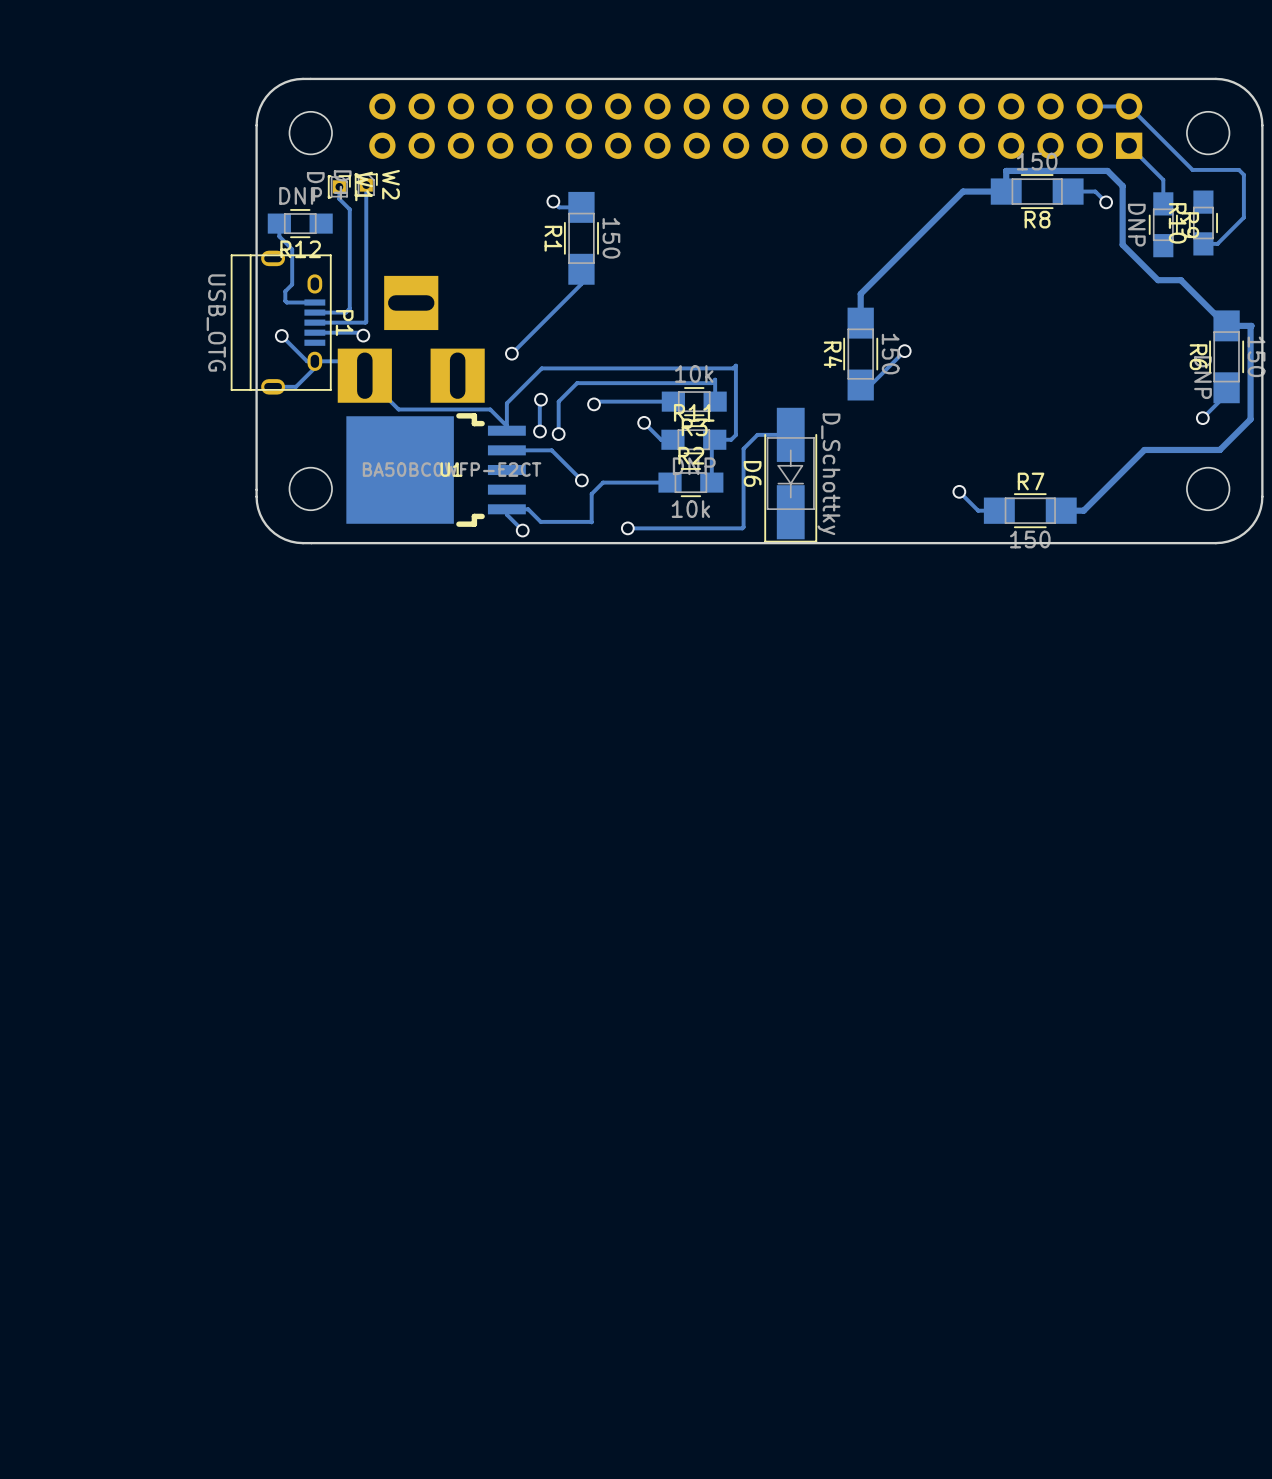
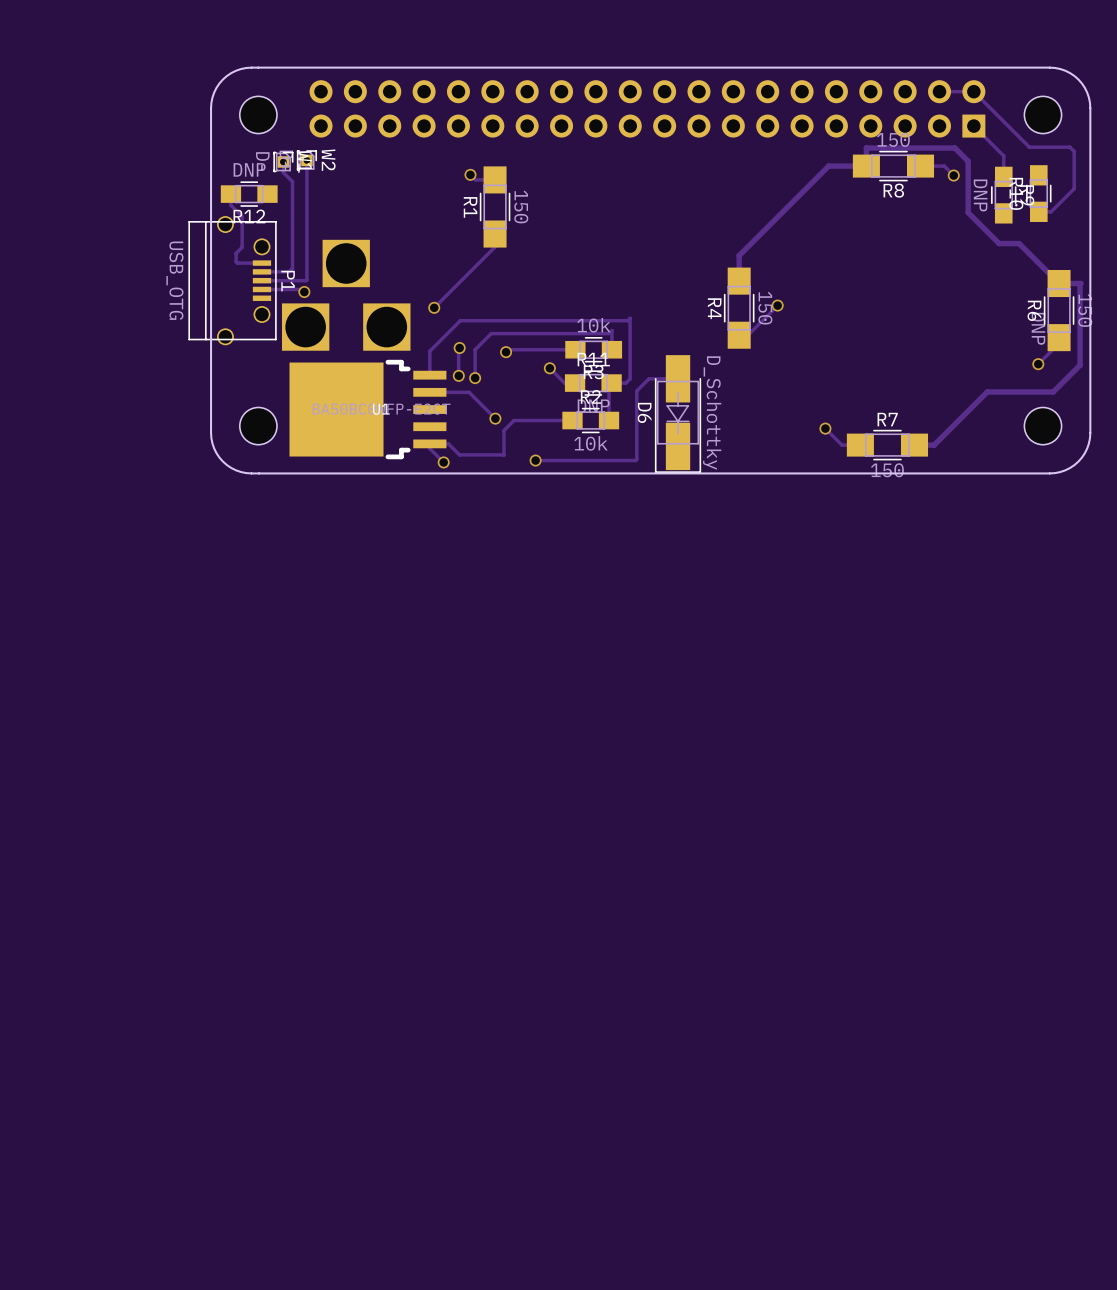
P1 footprint: [230, 250, 332, 395] -> [188, 216, 277, 346]
part footprint: [337, 275, 485, 403] -> [281, 239, 411, 351]
track: (281, 335) (307, 361) (350, 361) (398, 409) (490, 409) (506, 426) -> none
via: (281, 335) -> none
track: (314, 361) (314, 367) (295, 386) (273, 386) -> none

